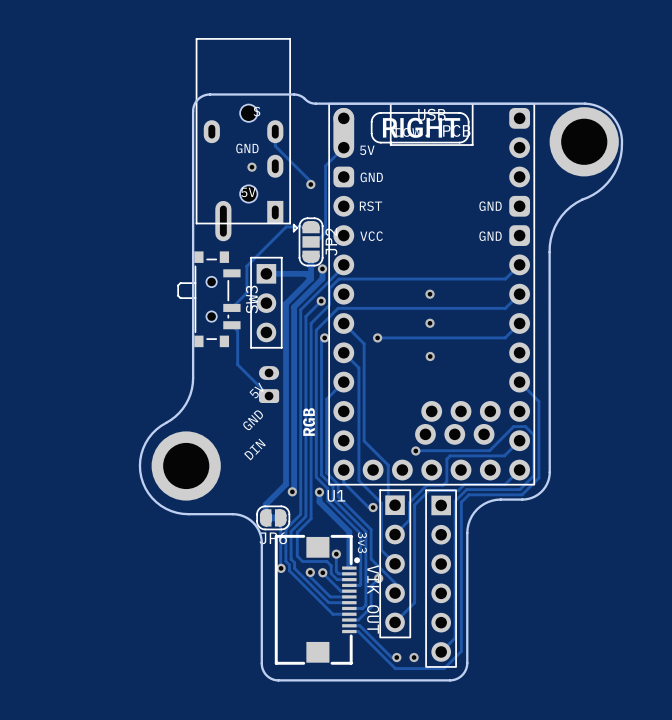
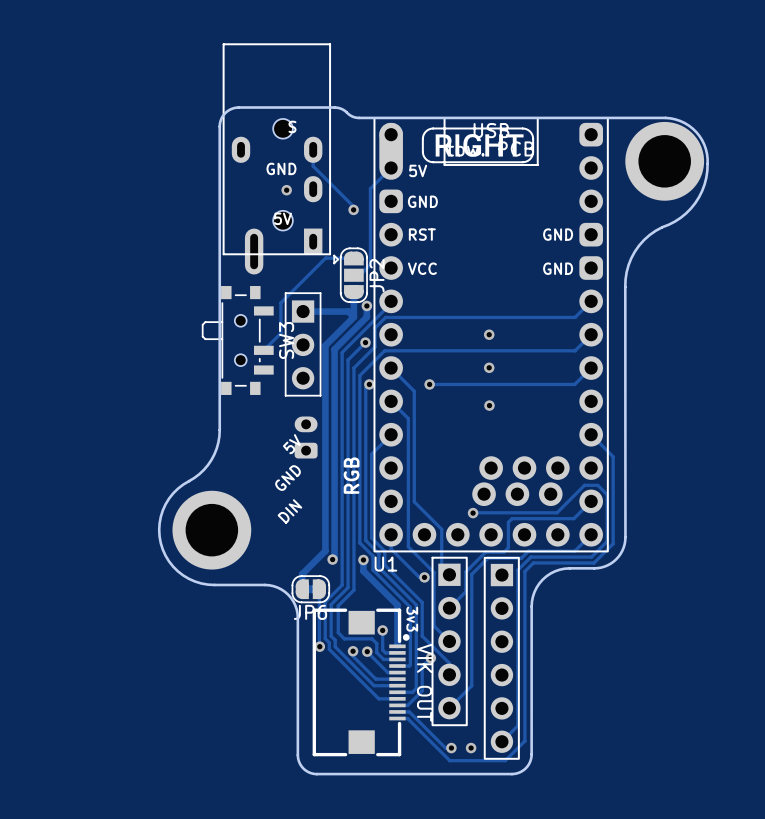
track: (231, 325) (237, 331) (237, 364) (269, 396) -> none

